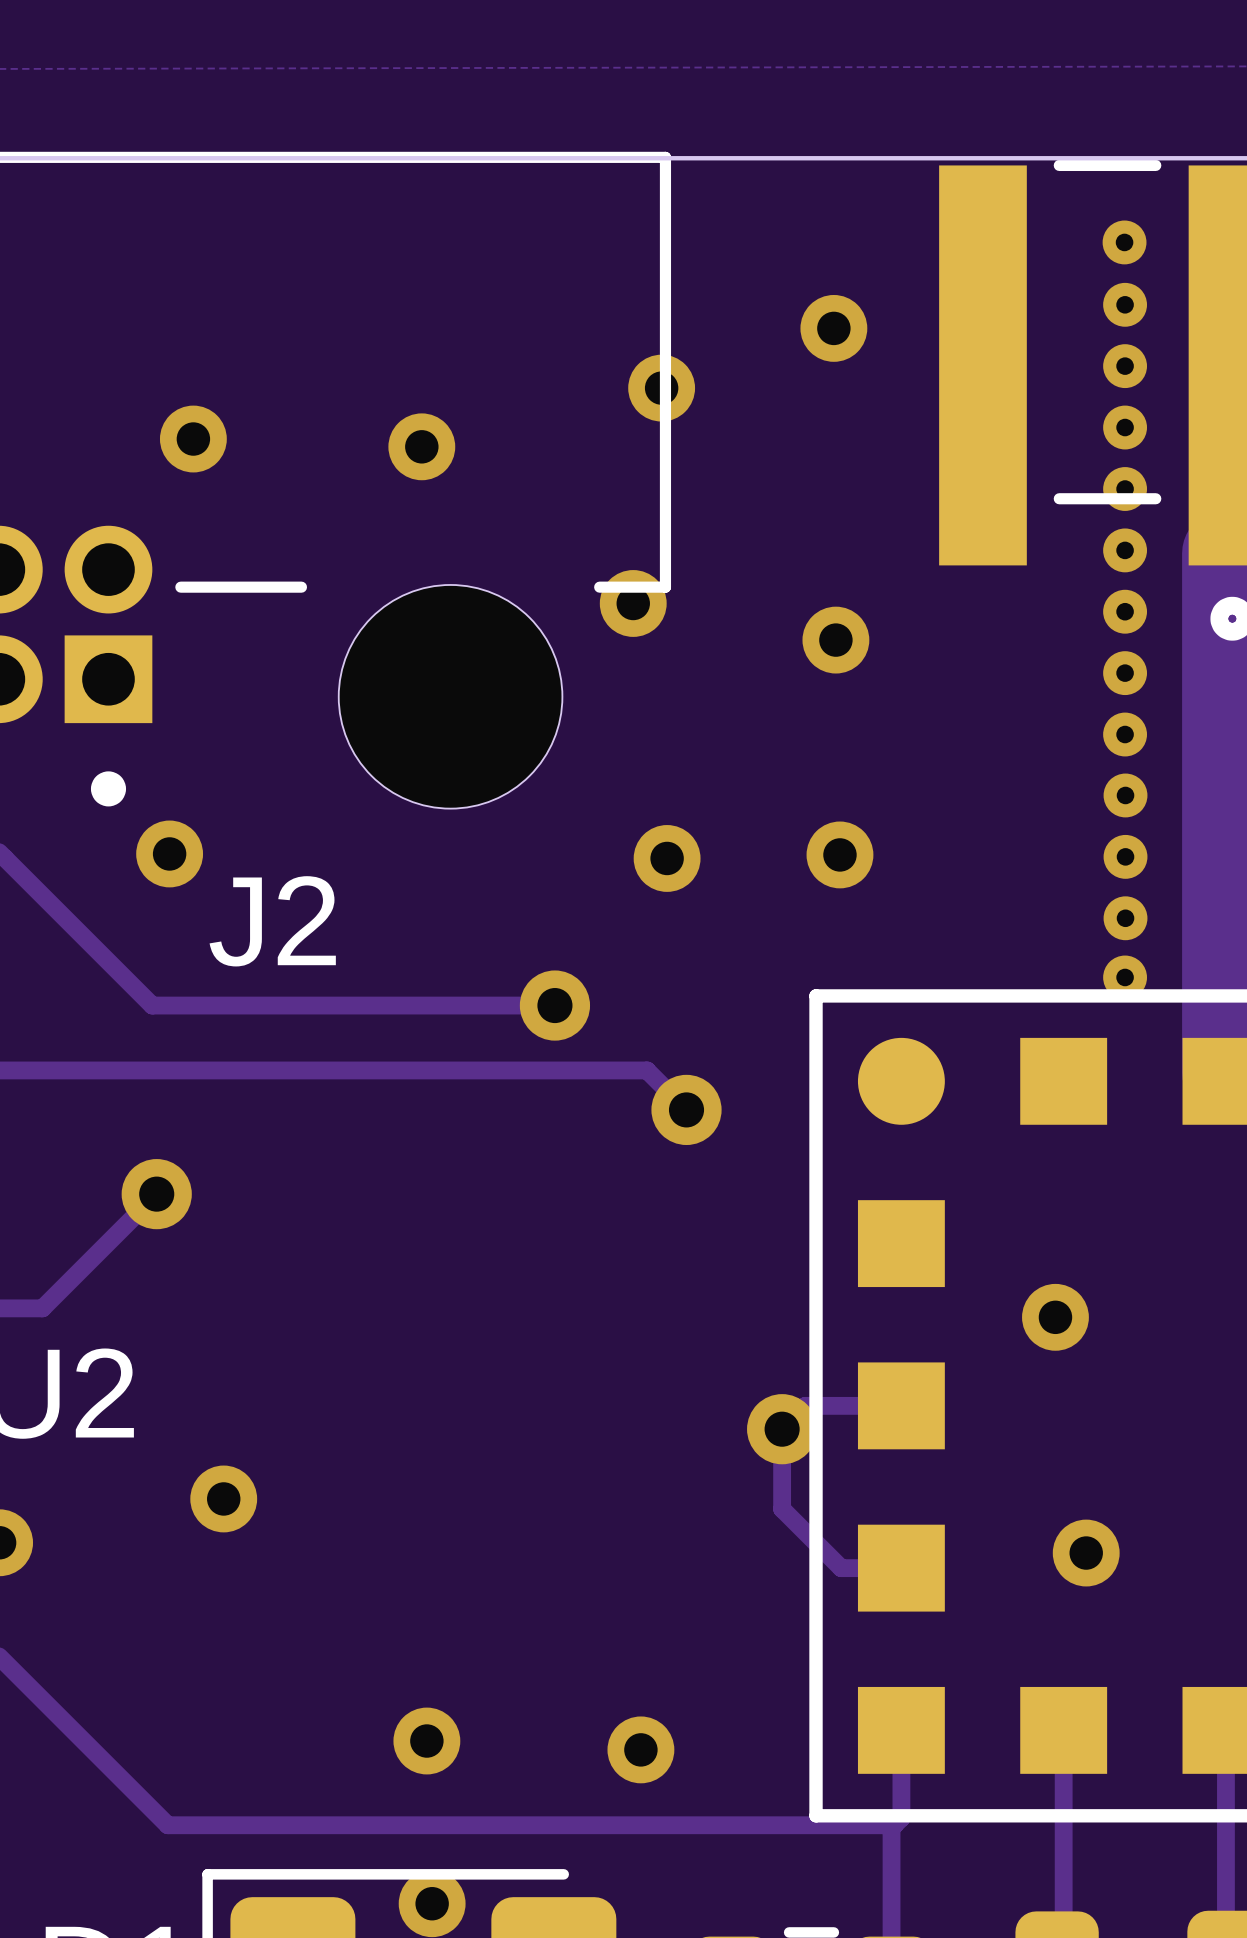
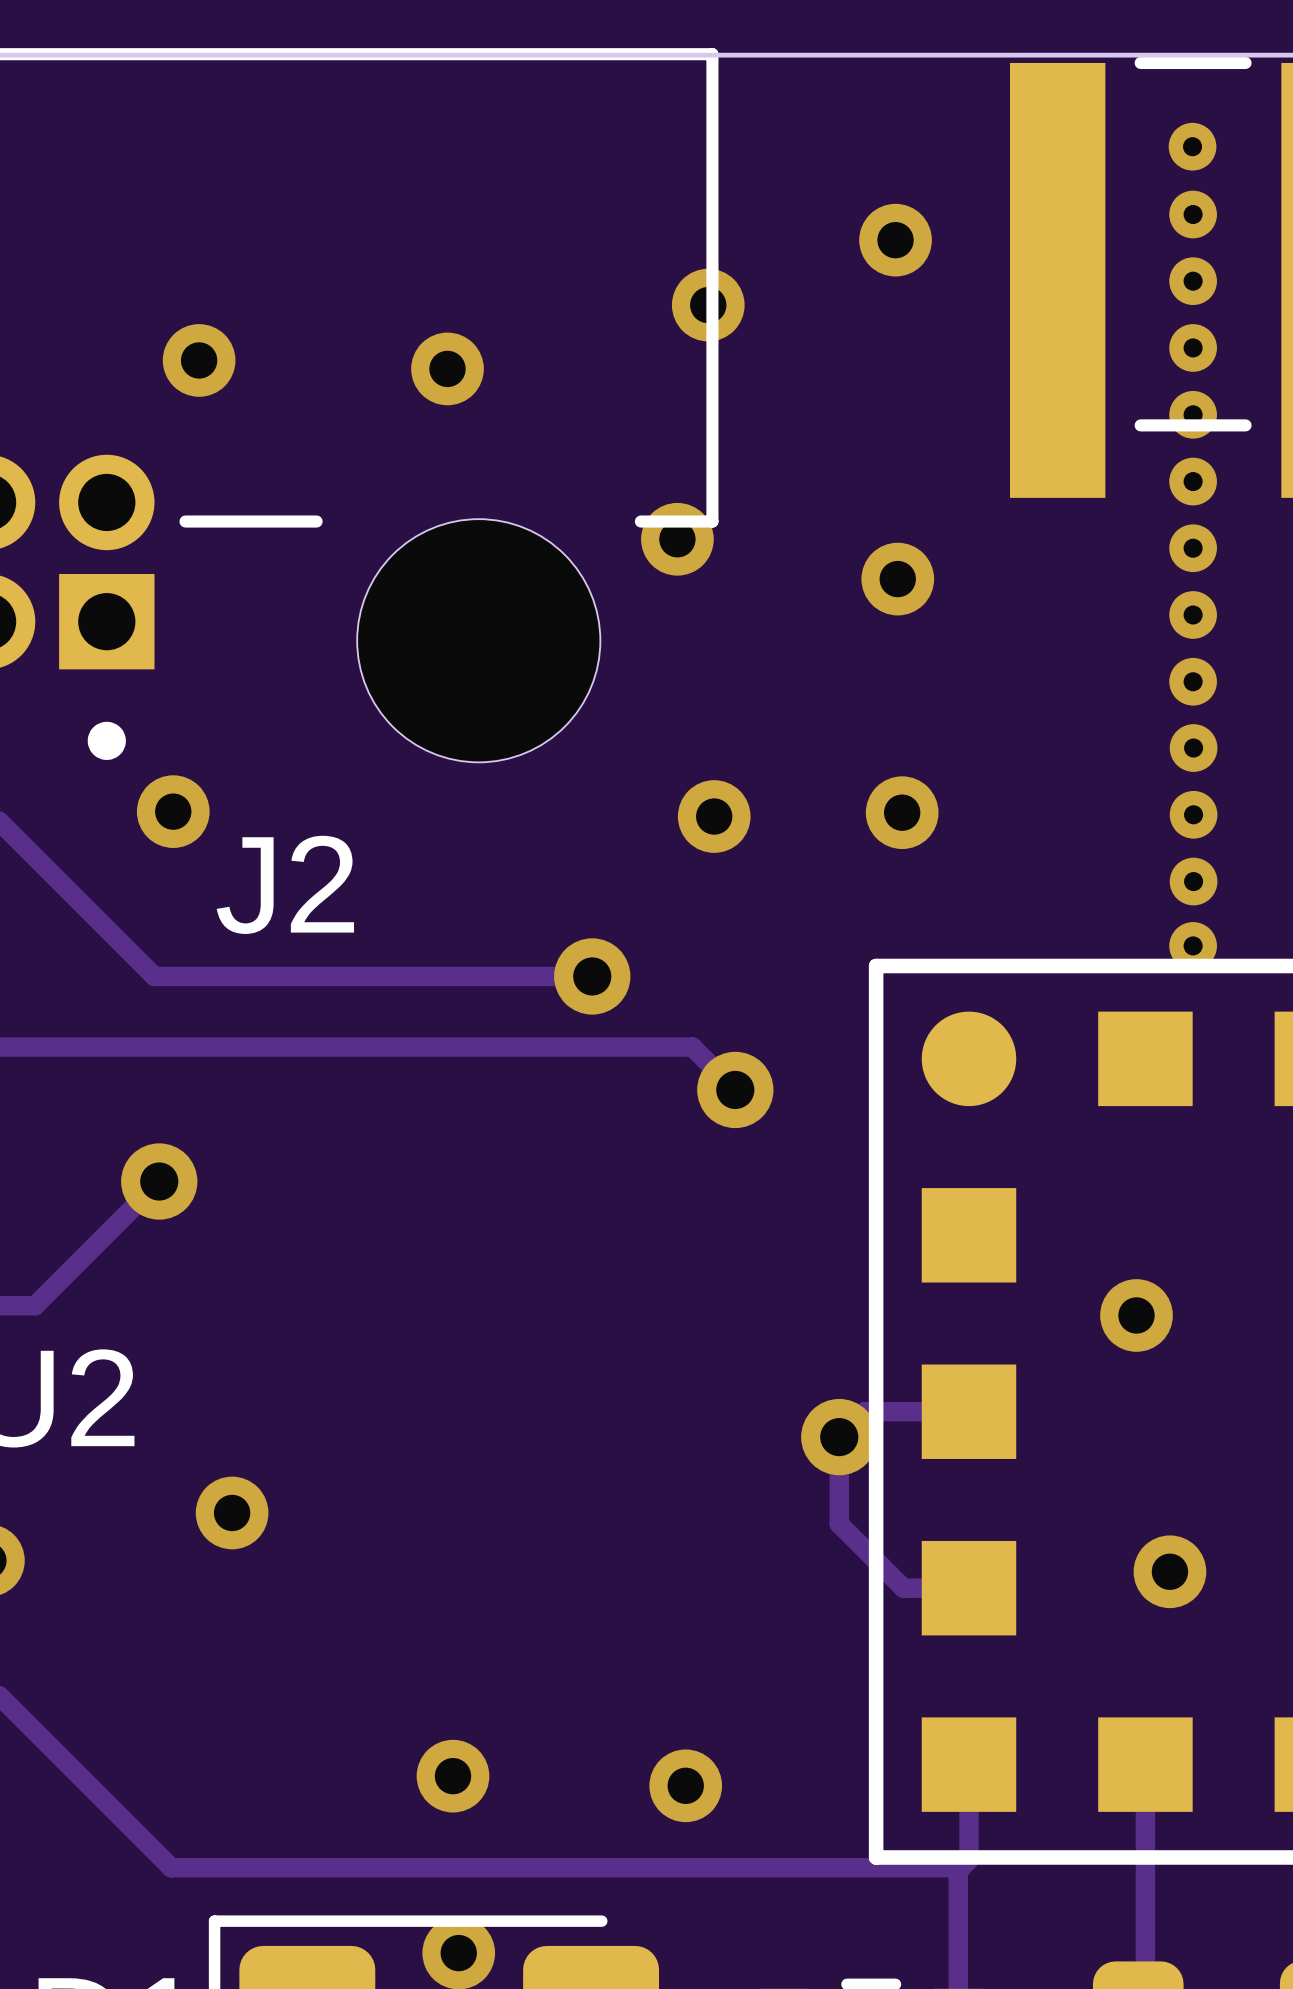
via position: (1124, 242) -> (1192, 146)
via position: (1125, 304) -> (1193, 214)
via position: (1125, 366) -> (1193, 281)
via position: (1125, 427) -> (1193, 347)
via position: (1125, 489) -> (1193, 414)
via position: (1125, 550) -> (1193, 481)
via position: (1125, 611) -> (1193, 548)
via position: (1125, 673) -> (1193, 614)
via position: (1125, 734) -> (1193, 681)
via position: (1125, 795) -> (1193, 748)
via position: (1125, 856) -> (1193, 814)
via position: (1125, 918) -> (1193, 881)
via position: (1125, 977) -> (1193, 945)

